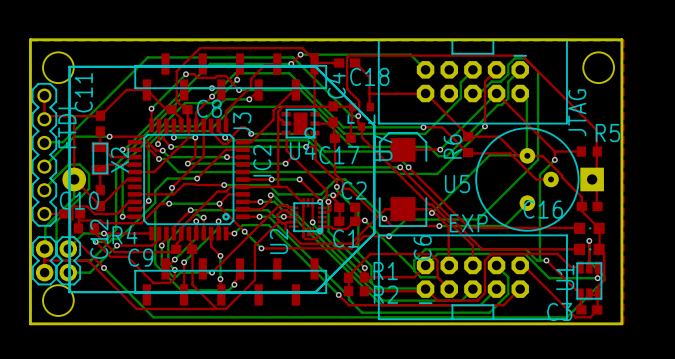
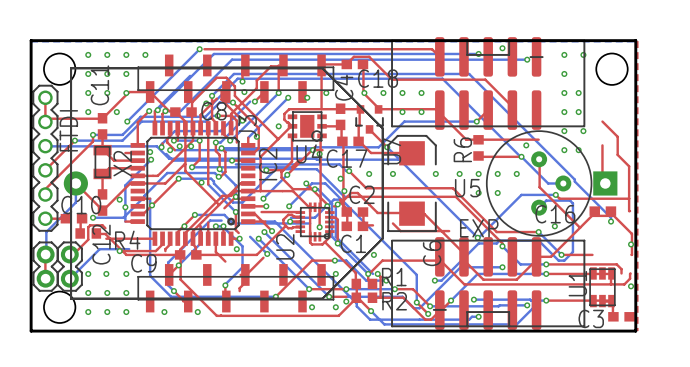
part footprint: [377, 38, 568, 125] -> [391, 37, 586, 130]
via: none -> (502, 48)
bottom track: none -> (199, 49) (127, 121)
via: none -> (199, 49)
top track: (199, 48) (176, 71) (176, 101) (187, 109) -> (221, 77) (216, 77) (192, 102) (191, 112)
top track: (302, 48) (316, 62) (314, 64) -> (309, 49) (432, 49) (439, 56)
bottom track: none -> (478, 53) (213, 53) (157, 110)
via: none -> (478, 53)
via: none -> (88, 54)
via: none -> (107, 54)
via: none -> (126, 54)
via: none -> (145, 54)
via: none -> (564, 54)
via: none -> (583, 54)
top track: (300, 54) (291, 63) -> none
bottom track: (300, 54) (410, 54) (425, 69) -> none
via: (300, 54) -> none
top track: (349, 55) (347, 57) (347, 89) (359, 101) (358, 122) (361, 126) -> (356, 56) (353, 56) (346, 64)
top track: (361, 55) (522, 55) (596, 130) (596, 183) (592, 179) (596, 184) (597, 206) -> (369, 56) (392, 79) (485, 79) (512, 106) (512, 110)
bottom track: (514, 58) (508, 64) (508, 74) (500, 81) (491, 81) (480, 92) (472, 93) -> (526, 59) (232, 59) (180, 111) (165, 111)
bottom track: (515, 58) (525, 58) (538, 71) (538, 159) (478, 219) (405, 219) (389, 236) -> none
via: none -> (527, 59)
bottom track: (291, 63) (210, 63) (122, 149) -> none
via: (291, 63) -> none
top track: (355, 63) (369, 77) (370, 107) -> none
top track: none -> (278, 65) (278, 93)
bottom track: (472, 69) (460, 82) (460, 98) (425, 133) (344, 133) (300, 90) (239, 90) -> none
top track: (496, 69) (485, 81) (485, 126) -> none
bottom track: (520, 69) (508, 81) (508, 98) (501, 104) (498, 104) (446, 156) (438, 156) (429, 146) (351, 146) (311, 106) (233, 106) (209, 131) (168, 131) -> (250, 101) (220, 131) (174, 131) (172, 133)
via: none -> (88, 73)
via: none -> (107, 73)
via: none -> (126, 73)
via: none -> (564, 73)
top track: (186, 74) (194, 74) (198, 77) (214, 77) (216, 76) -> none
via: (186, 74) -> none
top track: (221, 76) (226, 76) (239, 90) -> (226, 77) (234, 86) (234, 95) (278, 139)
bottom track: (237, 79) (213, 103) (185, 103) (122, 165) (122, 181) -> (151, 159) (125, 185)
bottom track: (212, 88) (191, 88) (116, 164) (116, 229) (104, 241) (95, 241) -> none
via: (212, 88) -> none
via: none -> (88, 93)
via: none -> (107, 93)
via: none -> (126, 93)
top track: none -> (221, 92) (221, 99) (242, 120)
bottom track: none -> (278, 93) (231, 140)
via: none -> (278, 93)
top track: (295, 90) (273, 110) (273, 119) (251, 142) (242, 142) -> (248, 137) (248, 145)
via: none -> (326, 93)
via: none -> (364, 93)
via: none -> (383, 93)
via: none -> (402, 93)
via: none -> (421, 93)
via: none -> (564, 93)
via: none -> (578, 93)
C11 name position: C11 (83, 92) -> C11 (99, 85)
bottom track: none -> (212, 95) (233, 73) (469, 73) (574, 179) (611, 217) (611, 221)
via: none -> (212, 95)
top track: (369, 93) (426, 93) (467, 136) -> (363, 64) (363, 93) (378, 109) (439, 109) (436, 110) (466, 139) (477, 139)
top track: (496, 93) (554, 151) -> none
bottom track: (496, 93) (440, 149) -> none
bottom track: (520, 93) (526, 100) (527, 155) (489, 155) (431, 213) -> none
bottom track: none -> (288, 97) (248, 137)
via: none -> (288, 97)
via: none -> (307, 97)
bottom track: (212, 96) (235, 73) (289, 73) (343, 127) (423, 127) -> none
via: (212, 96) -> none
bottom track: (249, 99) (225, 99) (198, 126) (167, 126) (148, 145) (148, 200) -> none
bottom track: none -> (233, 102) (219, 102) (205, 116) (140, 116) (122, 134) (93, 134)
via: none -> (233, 102)
bottom track: none -> (206, 103) (213, 103) (237, 78) (442, 78) (548, 183) (563, 183)
via: none -> (206, 103)
via: none -> (157, 110)
top track: none -> (488, 110) (476, 121)
via: none -> (149, 111)
via: (151, 108) -> none
via: none -> (165, 111)
via: none -> (88, 112)
via: none -> (116, 112)
via: none -> (402, 112)
via: none -> (421, 112)
via: none -> (564, 112)
via: none -> (578, 112)
text: JTAG (577, 112) -> none
bottom track: none -> (217, 115) (212, 115) (206, 121) (141, 121) (122, 140) (74, 140)
via: none -> (217, 115)
top track: (74, 116) (74, 179) -> none
bottom track: (358, 116) (351, 116) (293, 57) (147, 57) (63, 142) (44, 142) -> (399, 159) (169, 158) (156, 146) (45, 146)
via: (358, 116) -> none
top track: (278, 117) (278, 186) -> none
via: none -> (127, 121)
bottom track: none -> (242, 120) (220, 142) (215, 142)
via: none -> (242, 120)
bottom track: none -> (476, 121) (404, 121) (378, 147) (221, 148)
via: none -> (476, 121)
top track: none -> (602, 121) (617, 136) (617, 154) (629, 166) (629, 211)
via: none -> (278, 126)
top track: none -> (292, 126) (260, 156) (260, 191)
top track: (158, 125) (158, 140) -> (162, 128) (162, 113) (165, 111)
top track: none -> (185, 128) (185, 171) (219, 204)
top track: (211, 125) (211, 131) (223, 144) (226, 144) (231, 139) -> (215, 128) (215, 122) (212, 118) (212, 95)
bottom track: (485, 126) (437, 173) (398, 173) (396, 172) (178, 172) (165, 158) (158, 158) -> none
via: (485, 126) -> none
top track: (362, 127) (362, 137) (472, 245) (472, 265) -> (370, 130) (387, 147)
top track: (423, 127) (442, 127) (468, 152) -> none
via: (423, 127) -> none
via: none -> (564, 131)
via: none -> (583, 131)
top track: none -> (93, 134) (93, 141) (45, 189) (45, 194)
via: none -> (93, 134)
top track: (286, 132) (286, 150) (326, 190) (326, 201) (330, 205) (330, 210) (322, 212) -> (292, 135) (292, 161) (281, 172) (281, 177) (292, 189) (314, 189)
top track: (315, 132) (315, 159) (336, 181) (336, 186) -> (322, 135) (319, 207)
top track: (251, 133) (244, 127) (240, 127) (231, 136) -> (217, 115) (232, 115) (236, 120) (236, 139)
bottom track: (251, 133) (307, 133) (324, 151) (392, 151) (408, 167) -> none
top track: (109, 136) (142, 136) (156, 150) (162, 150) -> none
bottom track: (109, 136) (74, 136) (44, 166) -> none
via: (109, 136) -> none
top track: (498, 136) (517, 155) (526, 155) -> (510, 139) (538, 139)
top track: none -> (74, 140) (45, 170)
via: none -> (74, 140)
via: none -> (173, 140)
via: (173, 137) -> none
bottom track: (225, 137) (227, 140) (308, 140) (335, 167) (338, 167) -> (235, 164) (339, 164) (346, 171)
top track: (334, 138) (335, 173) (343, 182) (343, 188) -> (342, 141) (343, 211) (346, 212)
top track: none -> (215, 142) (215, 151) (219, 154) (219, 169)
via: none -> (215, 142)
top track: (134, 142) (142, 142) (158, 158) -> (137, 145) (137, 122) (149, 111)
via: none -> (526, 145)
top track: none -> (602, 145) (602, 180) (605, 183)
via: none -> (179, 146)
via: none -> (191, 146)
top track: none -> (314, 147) (287, 174)
bottom track: none -> (387, 147) (477, 237) (521, 194) (555, 194)
via: none -> (387, 147)
top track: none -> (221, 148) (225, 152) (225, 172) (218, 176)
via: none -> (221, 148)
via: none -> (170, 150)
via: (171, 146) -> none
via: none -> (564, 150)
via: none -> (578, 150)
via: none -> (150, 152)
via: (122, 149) -> none
top track: (242, 149) (226, 149) (197, 178) -> (248, 153) (253, 153) (258, 148) (258, 128) (233, 102)
top track: (403, 149) (440, 149) -> (412, 153) (371, 153) (358, 141)
via: (440, 149) -> none
via: (162, 150) -> none
via: none -> (319, 153)
top track: (554, 151) (581, 151) -> none
top track: (554, 151) (554, 159) -> none
R5: (589, 151) -> none
top track: (510, 153) (536, 179) (551, 179) -> none
via: none -> (521, 156)
via: none -> (151, 159)
top track: (203, 156) (172, 187) -> (208, 159) (208, 184)
top track: (527, 156) (542, 156) (562, 175) (581, 197) (581, 211) (599, 228) (599, 249) (604, 254) (604, 280) (598, 285) (597, 309) (590, 317) (575, 317) (524, 266) (520, 265) -> (539, 159) (539, 187) (580, 227)
via: (158, 158) -> none
bottom track: (554, 159) (539, 174) (539, 260) -> none
via: (554, 159) -> none
top track: none -> (185, 164) (165, 183) (137, 183)
via: (285, 163) -> none
bottom track: none -> (219, 169) (235, 185) (235, 196)
via: none -> (219, 169)
top track: none -> (266, 170) (282, 170)
via: none -> (266, 170)
top track: none -> (349, 171) (366, 188) (452, 188) (496, 232) (538, 232)
bottom track: (341, 167) (400, 167) -> none
via: none -> (349, 171)
top track: (400, 167) (482, 249) (549, 249) -> none
via: (400, 167) -> none
top track: (408, 167) (469, 227) (579, 228) -> none
via: (408, 167) -> none
via: none -> (369, 173)
via: none -> (392, 173)
via: none -> (435, 173)
via: none -> (459, 173)
via: none -> (478, 173)
via: none -> (497, 173)
via: none -> (516, 173)
bottom track: none -> (287, 174) (263, 198)
via: none -> (287, 174)
bottom track: none -> (218, 176) (214, 173) (167, 173) (123, 217) (93, 217)
via: none -> (218, 176)
top track: none -> (178, 178) (152, 205)
bottom track: none -> (178, 178) (211, 178) (233, 202) (242, 202) (275, 169) (316, 169) (344, 196) (349, 196)
via: none -> (178, 178)
via: none -> (340, 178)
bottom track: (197, 178) (167, 178) (155, 190) (155, 202) (118, 239) (112, 239) (90, 260) (63, 260) (56, 254) (56, 221) (89, 188) (89, 173) (79, 164) (68, 164) (44, 190) -> none
top track: (242, 179) (271, 179) -> (248, 183) (240, 183) (193, 231) (193, 238)
bottom track: (271, 179) (299, 179) -> none
via: (271, 179) -> none
bottom track: none -> (208, 184) (235, 212)
top track: (224, 185) (184, 184) (173, 194) (146, 194) -> none
bottom track: (224, 185) (268, 185) (278, 194) (321, 194) (335, 179) (345, 179) (384, 218) -> none
via: (224, 185) -> none
bottom track: none -> (314, 189) (317, 189) (332, 203) (332, 236) (368, 273)
via: none -> (314, 189)
bottom track: (336, 186) (336, 190) (358, 212) (358, 253) (371, 266) (370, 282) -> none
bottom track: (172, 187) (172, 192) (155, 209) (155, 264) (181, 290) -> (150, 198) (150, 275) (171, 296) (185, 296)
via: (172, 187) -> none
via: none -> (478, 193)
via: none -> (497, 193)
top track: none -> (555, 194) (559, 198) (629, 198)
via: none -> (555, 194)
via: none -> (235, 196)
top track: none -> (349, 196) (455, 196) (502, 243) (502, 246)
via: none -> (263, 198)
via: none -> (119, 199)
top track: (270, 195) (270, 199) (261, 209) (249, 209) -> (272, 231) (254, 213)
bottom track: (270, 195) (273, 195) (283, 205) (287, 205) (382, 300) (461, 300) (472, 289) -> none
via: (270, 195) -> none
via: (333, 195) -> none
via: none -> (337, 204)
top track: (134, 201) (129, 201) (117, 213) (94, 213) (87, 206) (74, 206) (72, 208) (70, 234) (104, 267) -> none
bottom track: (260, 201) (274, 201) (282, 210) (286, 210) (381, 305) (480, 305) (496, 289) -> none
bottom track: none -> (289, 206) (312, 183) (325, 183) (416, 274) (416, 302)
via: none -> (289, 206)
bottom track: none -> (326, 206) (314, 217) (291, 217)
via: (328, 201) -> none
via: none -> (125, 207)
top track: (169, 203) (160, 203) (141, 223) (103, 223) -> none
bottom track: (169, 203) (219, 203) -> none
via: (169, 203) -> none
top track: (219, 203) (219, 206) (244, 231) -> none
via: (219, 203) -> none
bottom track: (527, 203) (504, 226) (439, 226) -> (539, 207) (546, 200) (570, 200) (572, 203) (572, 252) (564, 260) (558, 260) (538, 240) (499, 240) (496, 243) (478, 243) (441, 280) (434, 280)
top track: none -> (235, 212) (235, 230) (238, 233)
via: none -> (235, 212)
top track: (288, 207) (279, 205) (212, 272) -> (294, 212) (261, 212)
top track: (369, 208) (377, 216) -> (377, 213) (412, 213)
top track: (403, 209) (385, 209) (350, 243) (300, 243) (285, 228) (285, 223) -> none
top track: (415, 209) (430, 209) (448, 226) (449, 265) -> (424, 213) (463, 252) (464, 260) (483, 279) (516, 279) (538, 257) (536, 256) (551, 256) (591, 215) (612, 215) (613, 211) (613, 215) (631, 233) (631, 254)
bottom track: (219, 210) (267, 210) (274, 216) (283, 216) -> (224, 214) (233, 223) (310, 223)
top track: none -> (329, 217) (337, 219) (337, 243)
via: none -> (93, 217)
via: (431, 213) -> none
bottom track: none -> (221, 220) (210, 220) (168, 262) (168, 285) (173, 291)
via: (122, 216) -> none
via: (259, 216) -> none
via: none -> (611, 221)
bottom track: (203, 217) (194, 214) (168, 240) (168, 263) (174, 269) -> none
via: (203, 217) -> none
via: (384, 218) -> none
top track: (78, 220) (88, 220) -> (69, 254) (73, 253) (88, 239) (88, 227) (90, 225)
bottom track: (364, 220) (414, 268) -> none
via: (364, 220) -> none
via: none -> (184, 226)
via: (196, 221) -> none
bottom track: none -> (215, 226) (222, 226) (242, 246) (242, 267) (224, 285)
via: none -> (215, 226)
bottom track: (218, 221) (218, 227) (184, 262) -> none
top track: (355, 221) (347, 228) (322, 226) -> none
via: none -> (554, 226)
bottom track: (312, 222) (376, 288) (425, 289) -> none
bottom track: none -> (264, 232) (329, 296)
via: none -> (264, 232)
via: none -> (272, 231)
via: (439, 226) -> none
bottom track: none -> (538, 232) (561, 254)
via: none -> (538, 232)
top track: (94, 228) (94, 232) (114, 252) (173, 252) (176, 249) -> none
part: (589, 228) -> none
via: (244, 231) -> none
via: none -> (477, 237)
bottom track: (104, 233) (83, 233) (68, 248) -> none
via: (104, 233) -> none
bottom track: (234, 233) (242, 225) (268, 225) (338, 294) -> none
bottom track: none -> (258, 238) (309, 289)
via: none -> (258, 238)
part footprint: [377, 234, 568, 321] -> [391, 237, 586, 330]
top track: (389, 236) (363, 236) (351, 248) (261, 248) -> none
via: (389, 236) -> none
via: none -> (337, 243)
via: none -> (631, 244)
bottom track: none -> (502, 246) (520, 264) (546, 264)
via: none -> (502, 246)
top track: (589, 240) (589, 267) -> none
bottom track: (589, 240) (589, 261) (604, 276) (604, 280) (566, 317) (505, 317) -> (532, 300) (532, 308) (516, 324)
via: (589, 240) -> none
top track: (95, 241) (110, 256) (127, 256) (153, 282) (170, 282) (174, 278) (174, 269) -> none
via: (95, 241) -> none
via: none -> (236, 249)
bottom track: (117, 245) (90, 272) (68, 272) -> (129, 249) (99, 249) (70, 278)
bottom track: (161, 245) (161, 265) (172, 276) (176, 276) (180, 272) (212, 272) -> none
via: (161, 245) -> none
top track: (254, 245) (254, 280) (226, 308) -> (260, 251) (256, 254) (196, 254)
top track: (192, 249) (192, 284) (216, 308) -> none
via: none -> (373, 254)
via: none -> (561, 254)
part: (589, 249) -> none
top track: none -> (263, 257) (246, 274) (240, 274)
top track: none -> (334, 260) (312, 260) (275, 296)
bottom track: none -> (334, 260) (346, 260) (366, 280) (386, 280)
via: none -> (334, 260)
bottom track: (220, 255) (220, 279) -> none
via: (220, 255) -> none
top track: none -> (546, 264) (616, 264) (621, 269) (621, 273)
via: none -> (546, 264)
top track: (44, 260) (88, 260) (136, 308) (212, 308) -> (96, 233) (105, 233) (126, 254) (180, 254) (180, 279) (216, 315)
top track: (546, 260) (580, 294) (581, 309) -> none
bottom track: (546, 260) (537, 260) (525, 249) (425, 249) (414, 260) (414, 270) (420, 277) (437, 277) (449, 289) -> none
via: (546, 260) -> none
bottom track: none -> (502, 267) (460, 267) (419, 308) (413, 308) (402, 296) (346, 296)
via: none -> (502, 267)
top track: (184, 262) (184, 294) -> none
via: (184, 262) -> none
top track: (425, 265) (414, 277) (364, 277) (364, 267) -> none
bottom track: (425, 265) (437, 254) (525, 254) (549, 278) (597, 278) -> none
bottom track: (496, 265) (508, 277) (508, 294) (489, 312) (458, 312) -> (478, 316) (472, 316) (469, 319)
via: none -> (88, 273)
bottom track: (104, 267) (153, 317) (376, 317) -> (371, 311) (384, 324)
via: none -> (126, 273)
via: none -> (335, 273)
via: none -> (368, 273)
via: (364, 267) -> none
top track: none -> (377, 273) (380, 276) (380, 297)
via: none -> (377, 273)
bottom track: none -> (546, 273) (477, 273) (451, 300)
via: none -> (546, 273)
top track: (580, 267) (570, 267) (557, 254) (491, 254) (485, 260) (485, 293) (477, 300) (437, 300) (425, 289) (423, 291) (394, 291) -> (451, 300) (431, 319) (425, 319) (403, 297)
top track: none -> (612, 273) (546, 273)
top track: none -> (630, 273) (630, 278) (624, 284) (464, 284) (440, 260) (439, 256) (439, 260) (382, 260) (368, 273) (368, 279) (372, 283)
via: (174, 269) -> none
via: (212, 272) -> none
via: none -> (386, 280)
via: none -> (434, 280)
top track: (348, 277) (370, 254) (430, 254) (437, 260) (437, 277) (449, 289) -> (356, 283) (355, 272) (324, 242)
via position: (597, 278) -> (631, 286)
top track: none -> (309, 289) (346, 289)
via: none -> (309, 289)
bottom track: none -> (346, 289) (394, 289)
via: none -> (346, 289)
top track: none -> (394, 289) (412, 289) (430, 306)
via: none -> (394, 289)
top track: none -> (173, 291) (183, 301)
via: none -> (173, 291)
bottom track: (234, 284) (228, 290) -> (275, 296) (233, 296)
via: (234, 284) -> none
via: none -> (88, 292)
via: none -> (107, 292)
via: none -> (126, 292)
top track: (520, 289) (503, 305) (349, 305) (338, 294) -> none
via: none -> (275, 296)
top track: none -> (329, 296) (346, 296)
via: none -> (329, 296)
top track: none -> (356, 297) (338, 315) (231, 315)
top track: none -> (356, 297) (371, 311)
bottom track: none -> (473, 299) (546, 300)
via: none -> (473, 299)
via: none -> (451, 300)
top track: none -> (546, 300) (611, 300) (613, 316)
via: none -> (546, 300)
top track: none -> (416, 302) (428, 313)
via: none -> (416, 302)
bottom track: none -> (527, 305) (430, 306)
via: none -> (527, 305)
via: none -> (430, 306)
via: none -> (312, 307)
via: none -> (335, 307)
via: none -> (371, 311)
via: none -> (88, 312)
via: none -> (107, 312)
via: none -> (126, 312)
via: none -> (164, 312)
via: none -> (197, 312)
via: none -> (428, 313)
via: none -> (478, 316)
C3 position: (589, 309) -> (621, 316)

